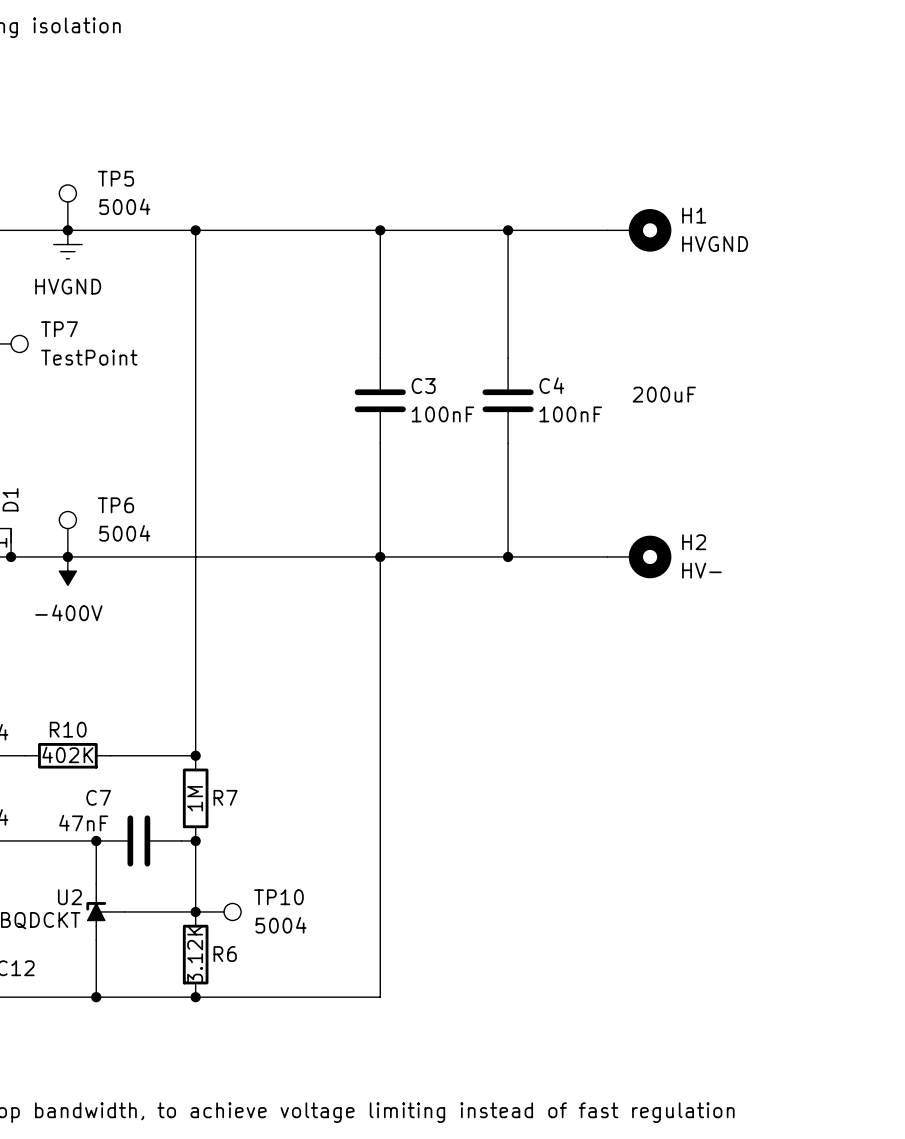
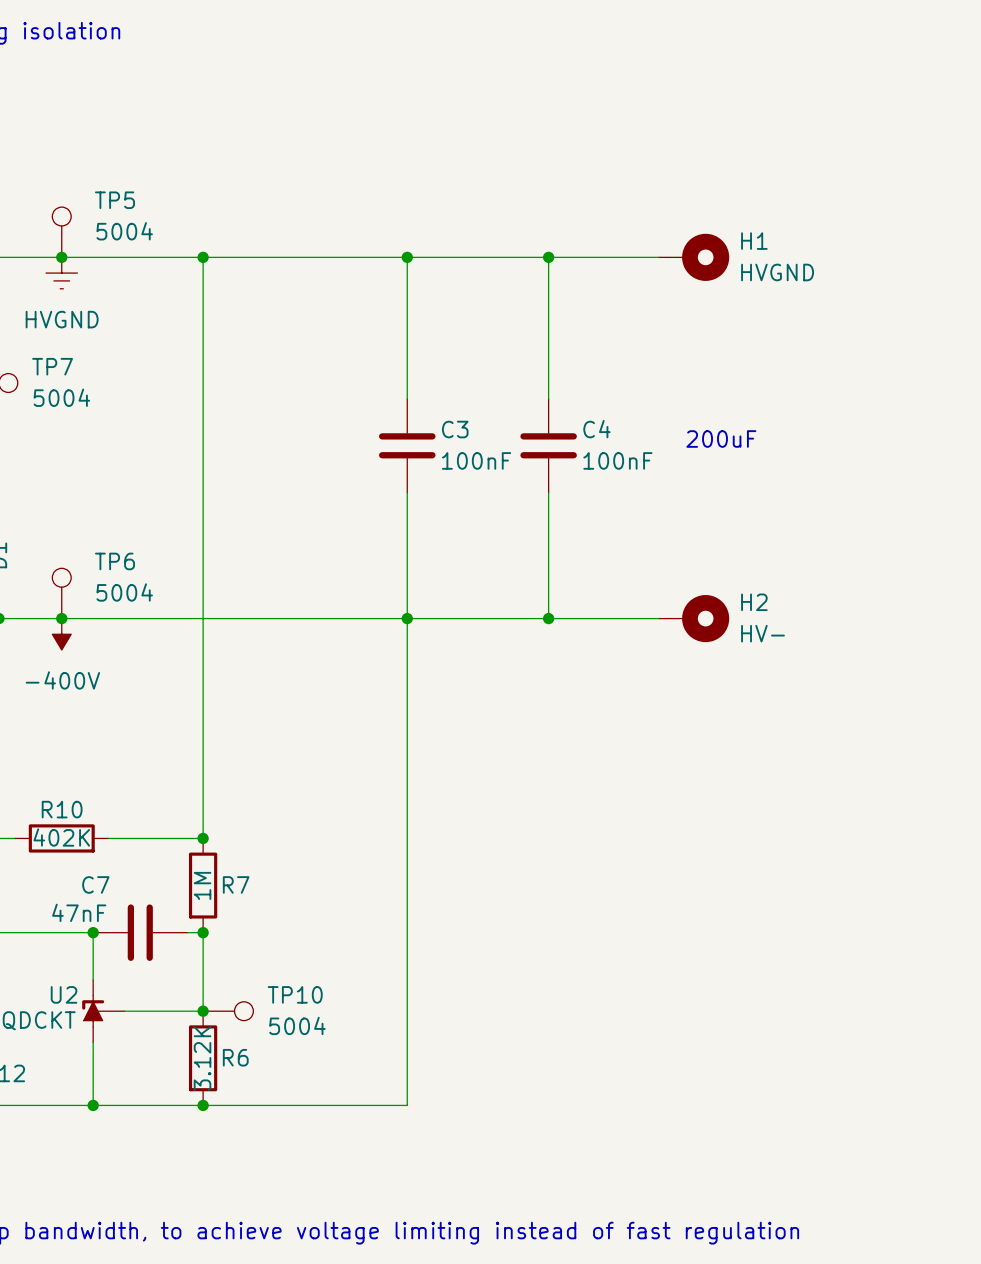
TP7 value: TestPoint (89, 357) -> 5004 (61, 397)

